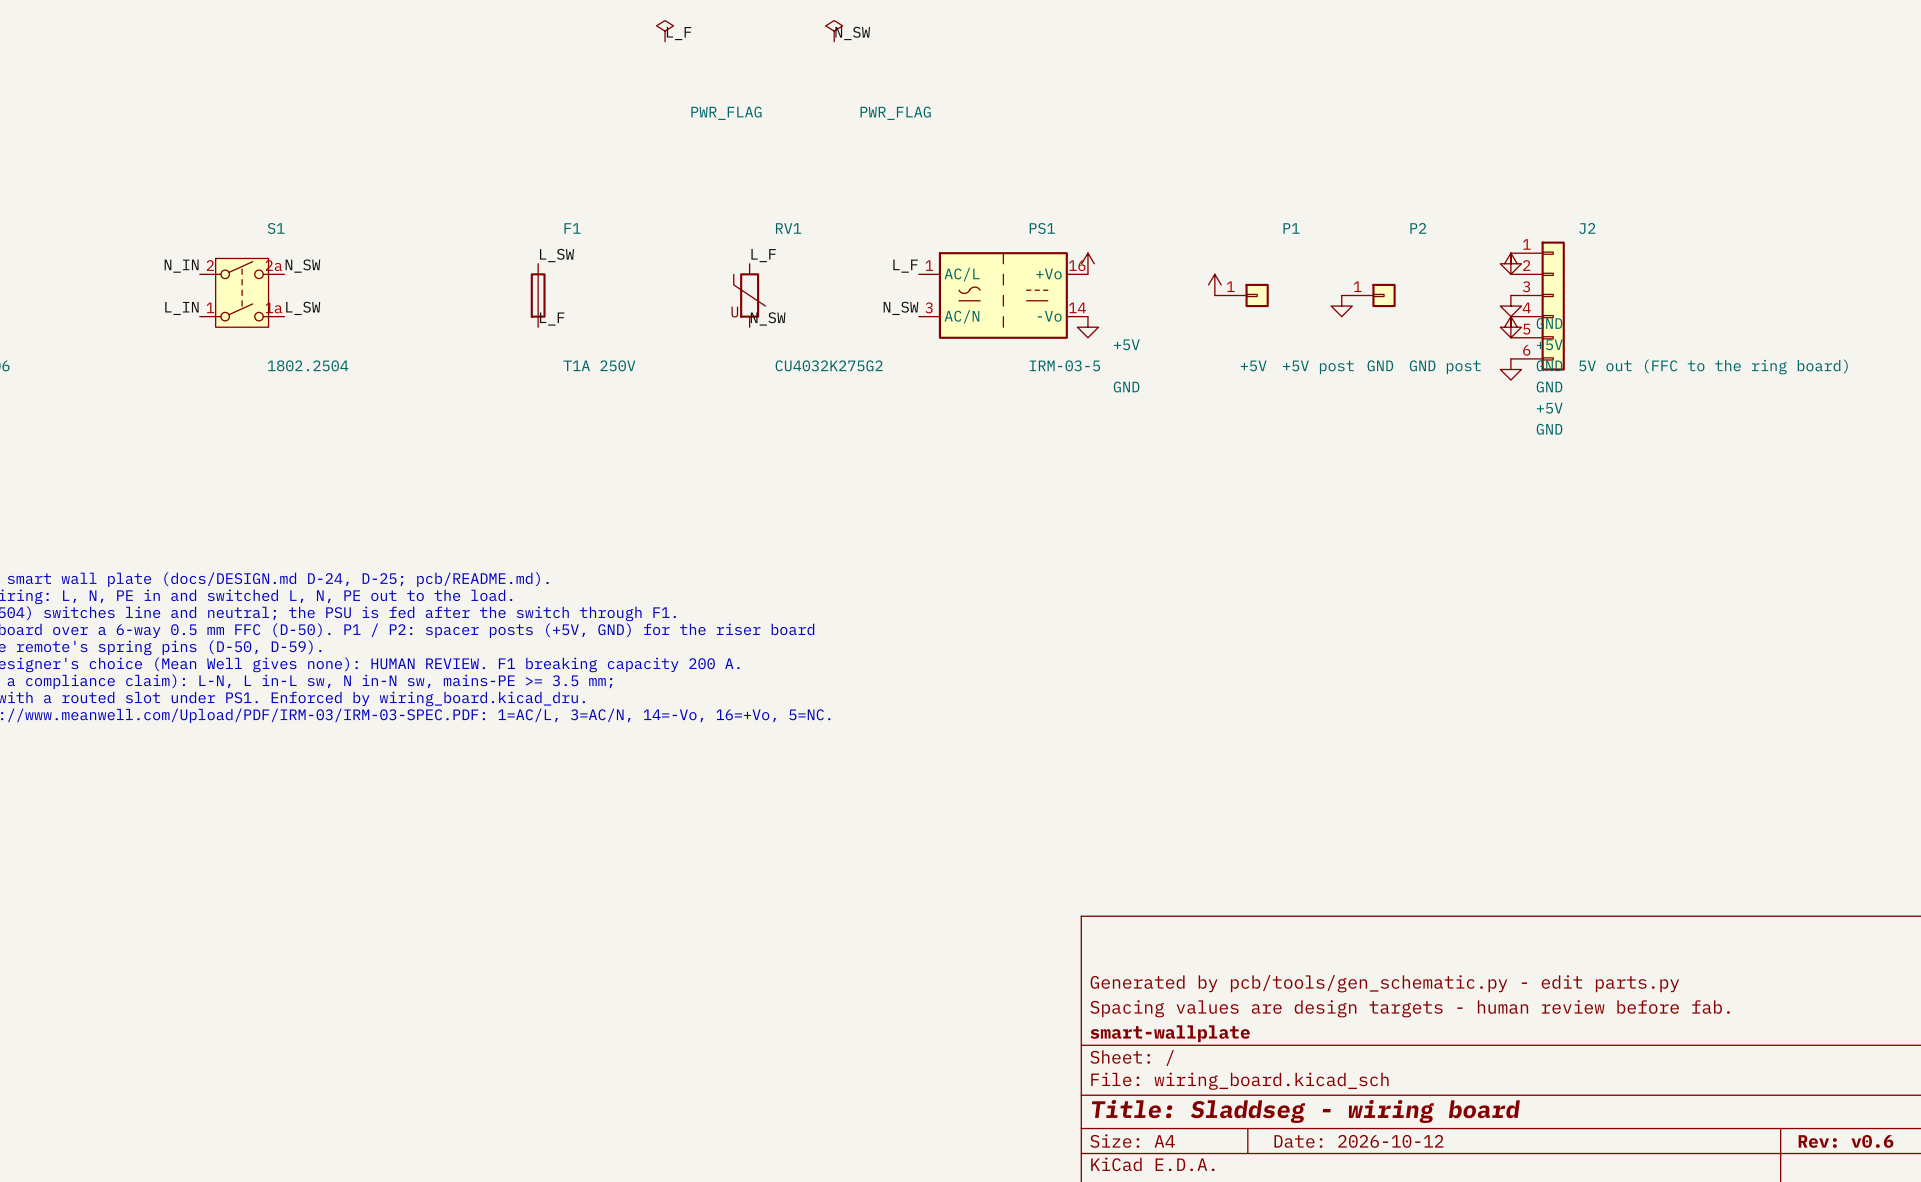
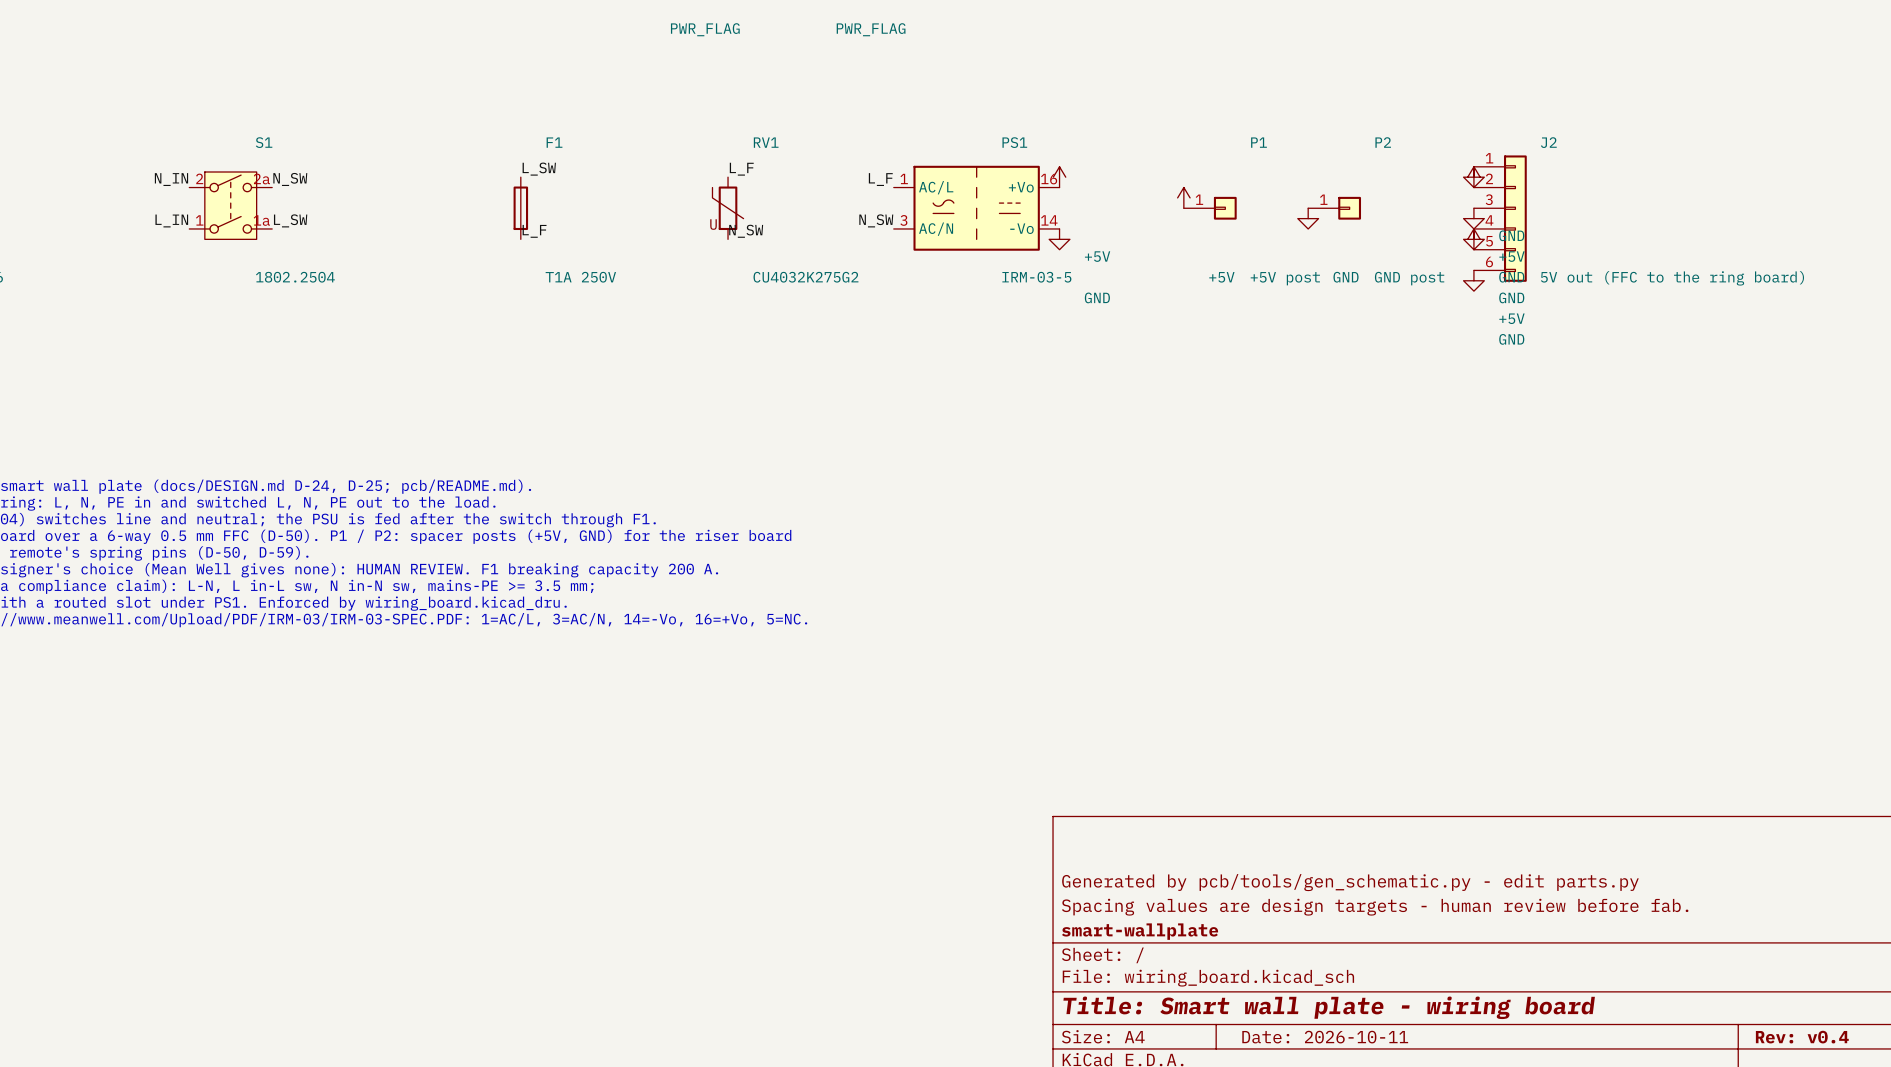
title block: Title: Sladdseg - wiring board (1305, 1111) -> Title: Smart wall plate - wiring board (1329, 1007)
title block: Date: 2026-10-12 (1358, 1141) -> Date: 2026-10-11 (1325, 1037)
title block: Rev: v0.6 (1846, 1141) -> Rev: v0.4 (1802, 1037)

